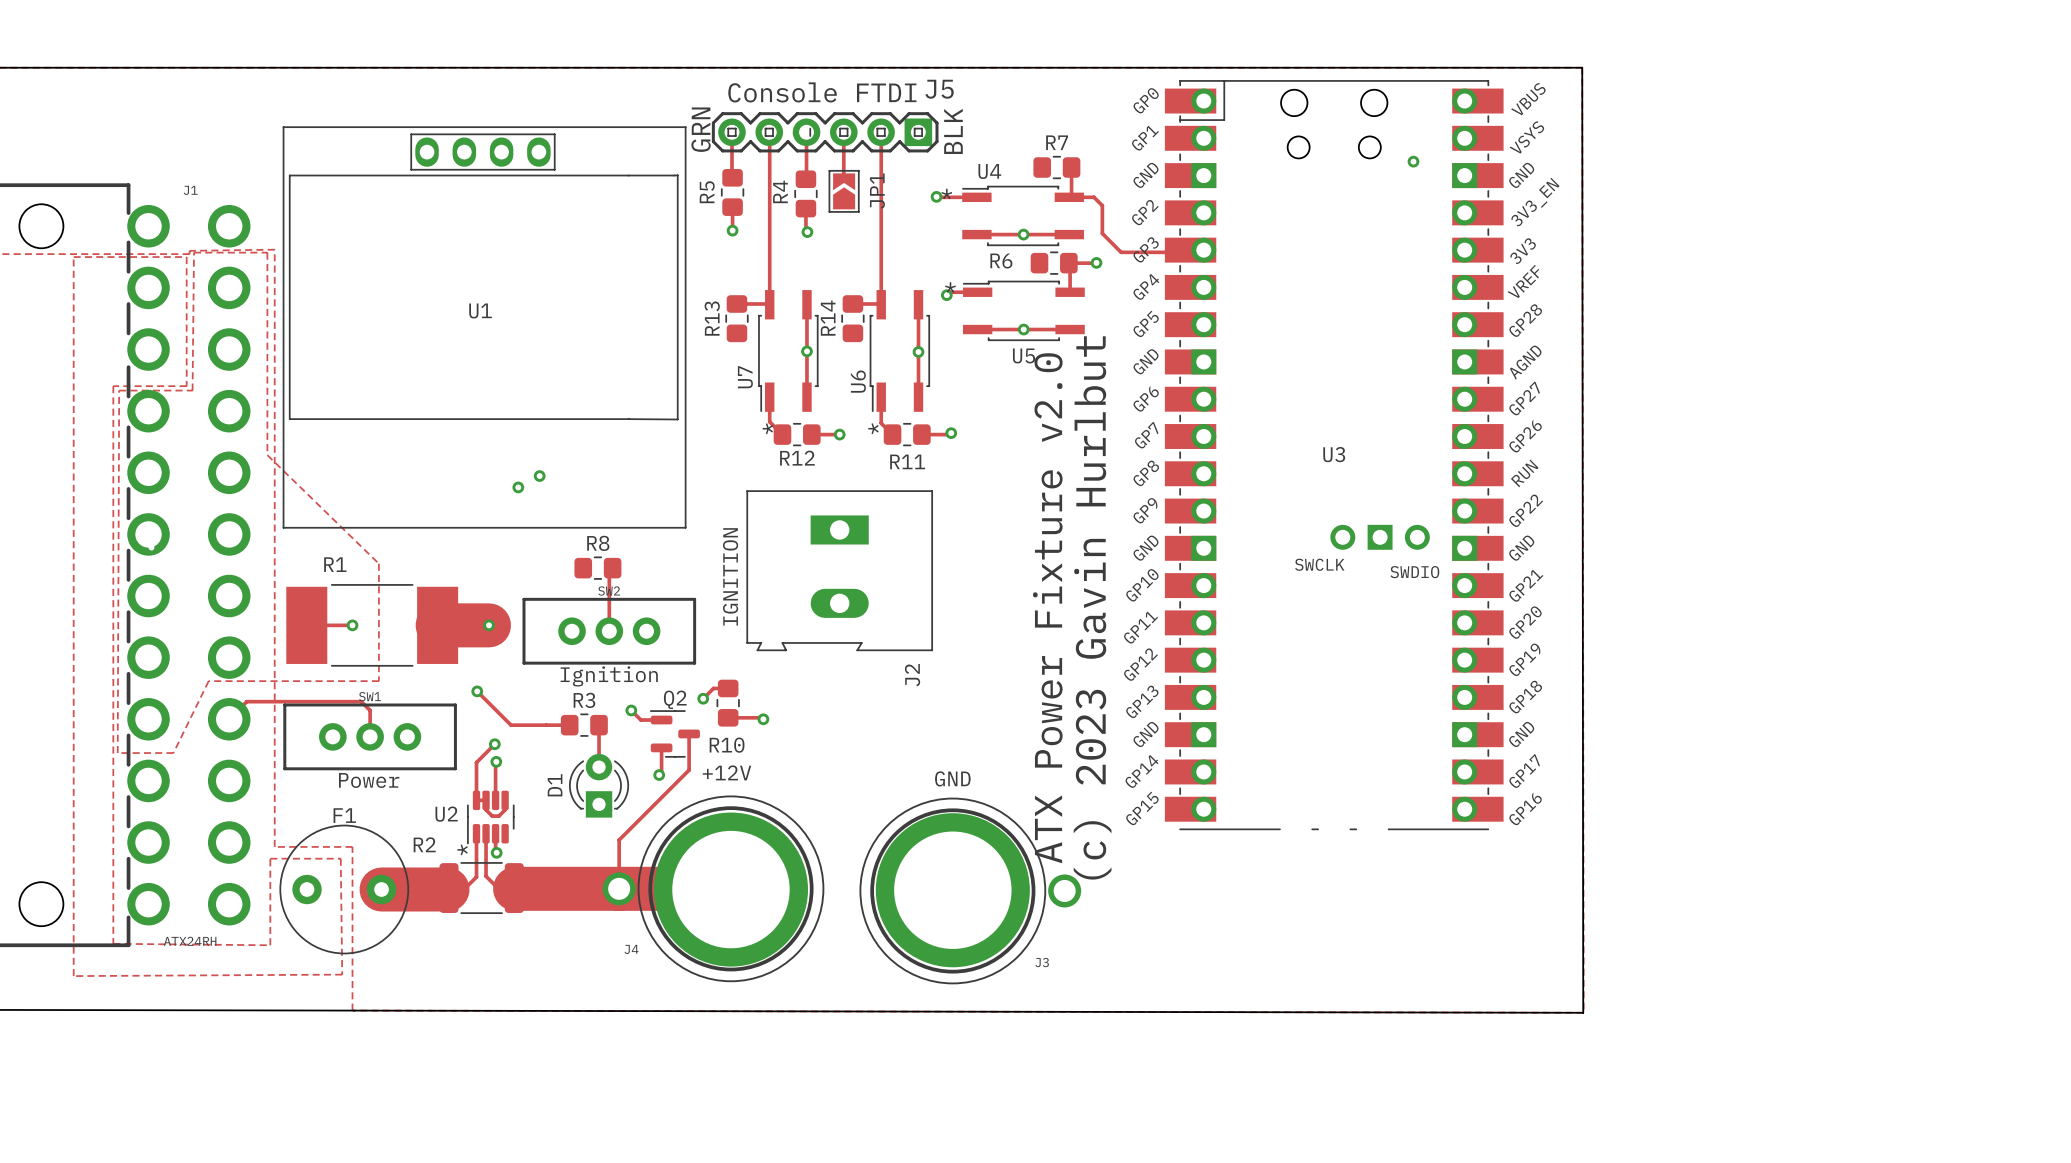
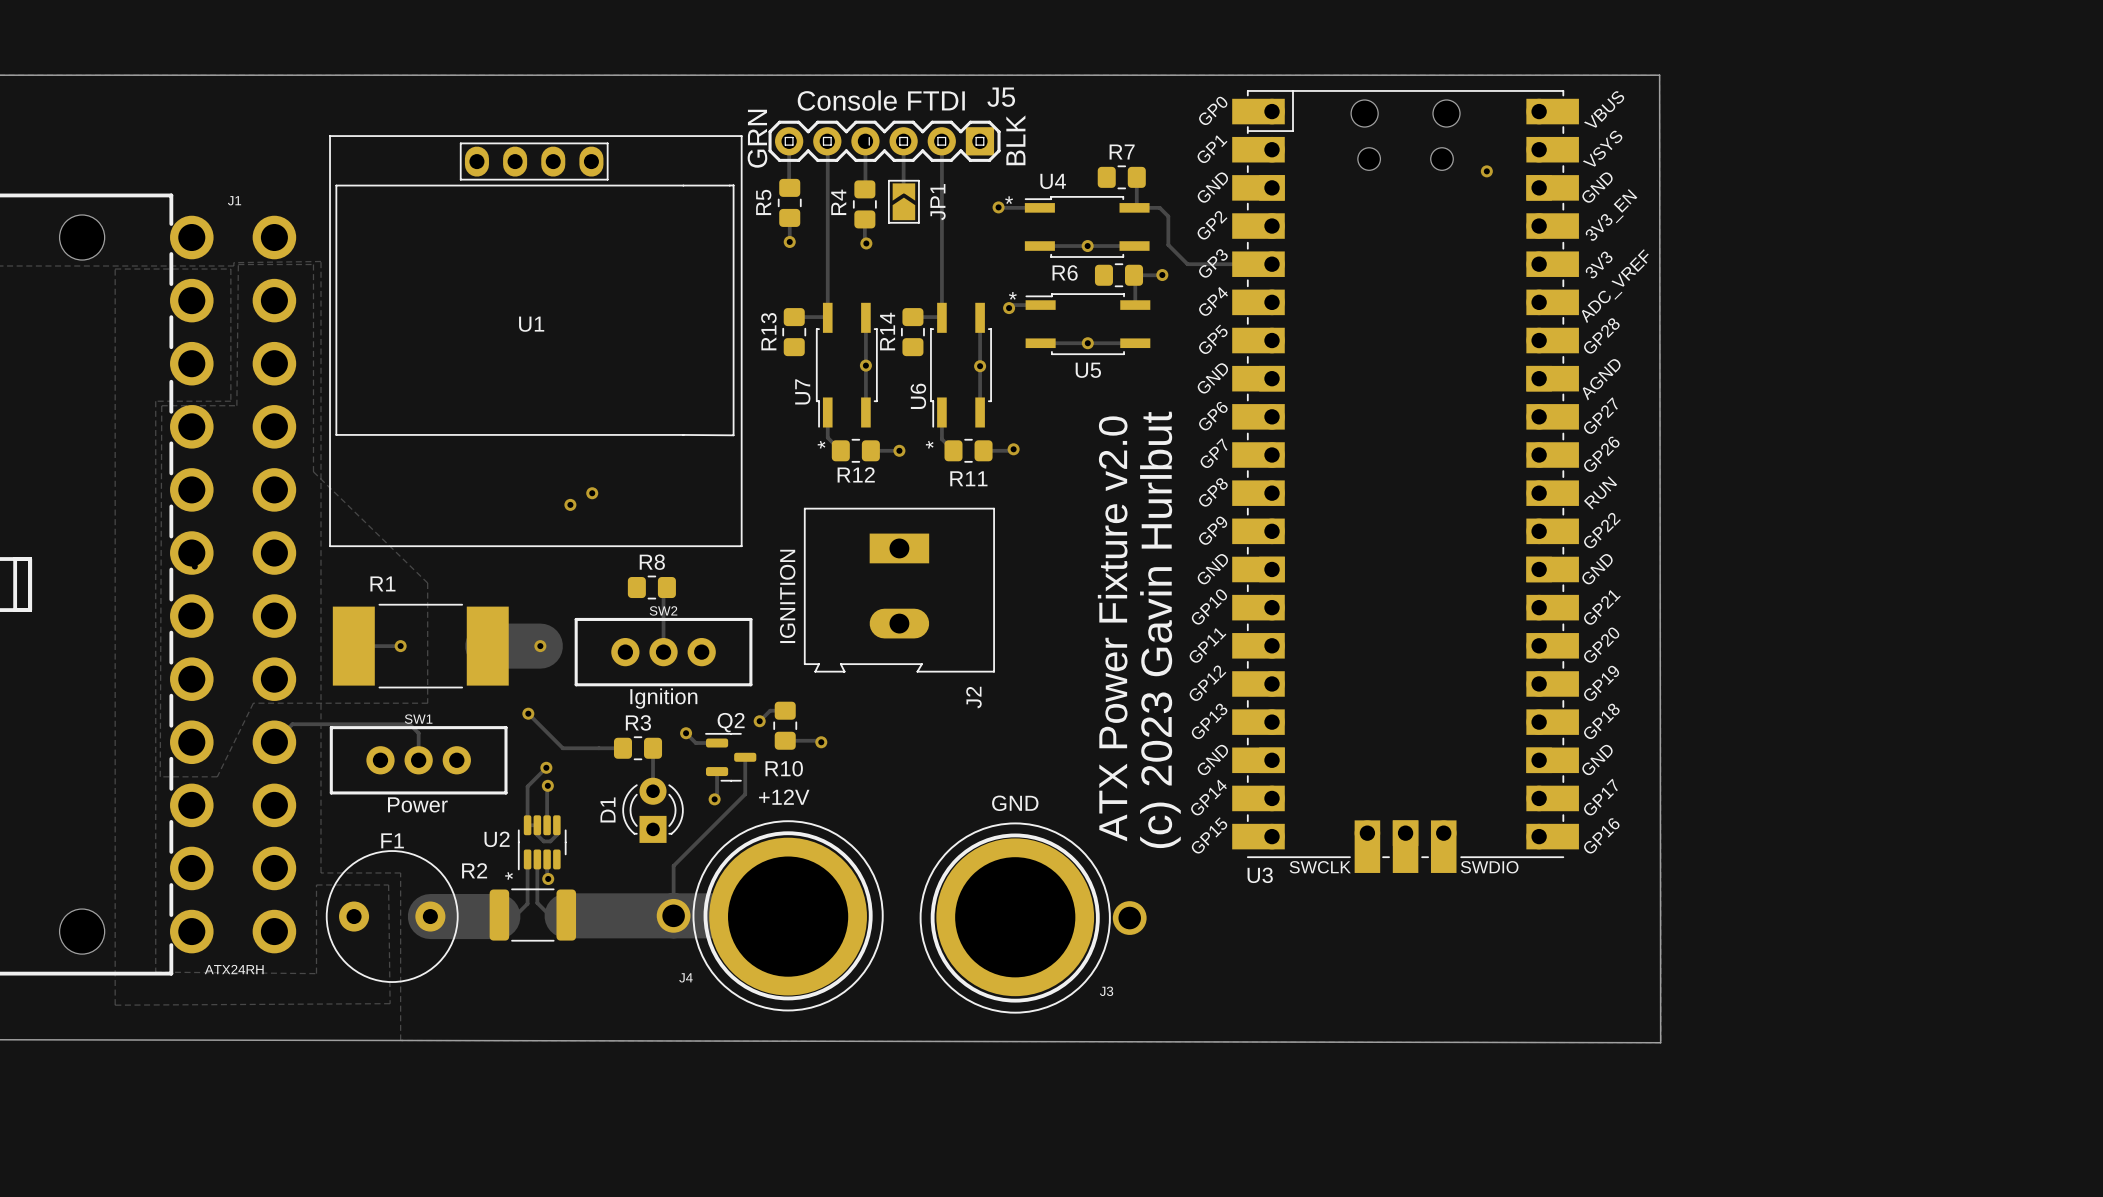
U3 footprint: [1164, 80, 1504, 831] -> [1232, 90, 1579, 873]
U3 name position: U3 (1334, 454) -> U3 (1260, 875)

